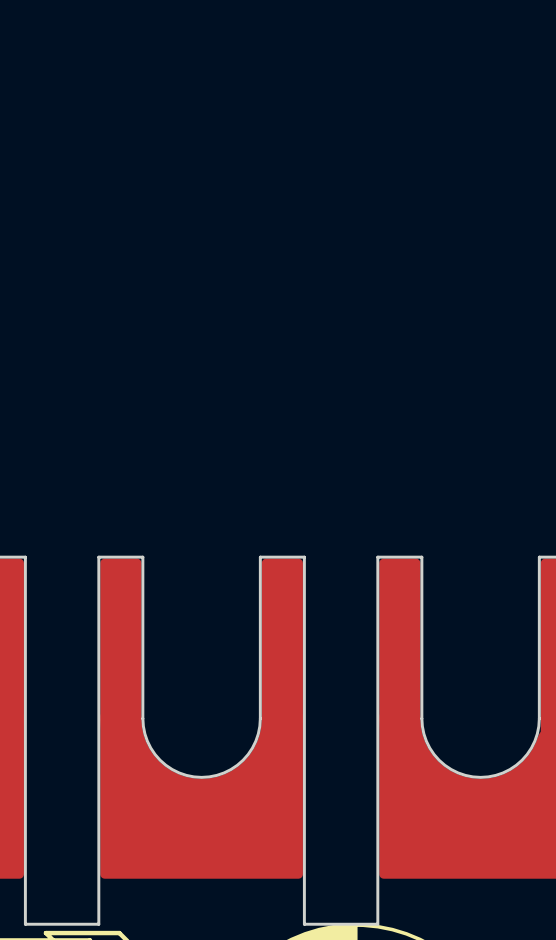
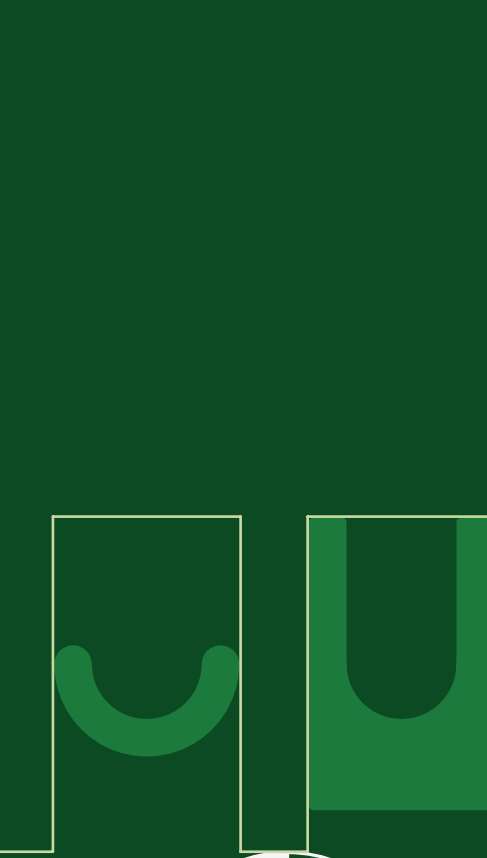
board edge: (142, 557) (142, 718) (144, 733) (155, 754) (165, 765) (186, 775) (201, 777) (216, 775) (237, 765) (248, 754) (258, 733) (260, 718) (260, 557) -> (93, 516) (200, 516)
board edge: (421, 557) (421, 718) (423, 733) (434, 754) (444, 765) (465, 775) (480, 777) (495, 775) (516, 765) (527, 754) (537, 733) (539, 718) (539, 557) -> (347, 516) (455, 516)
drawing: [100, 558, 303, 879] -> none

